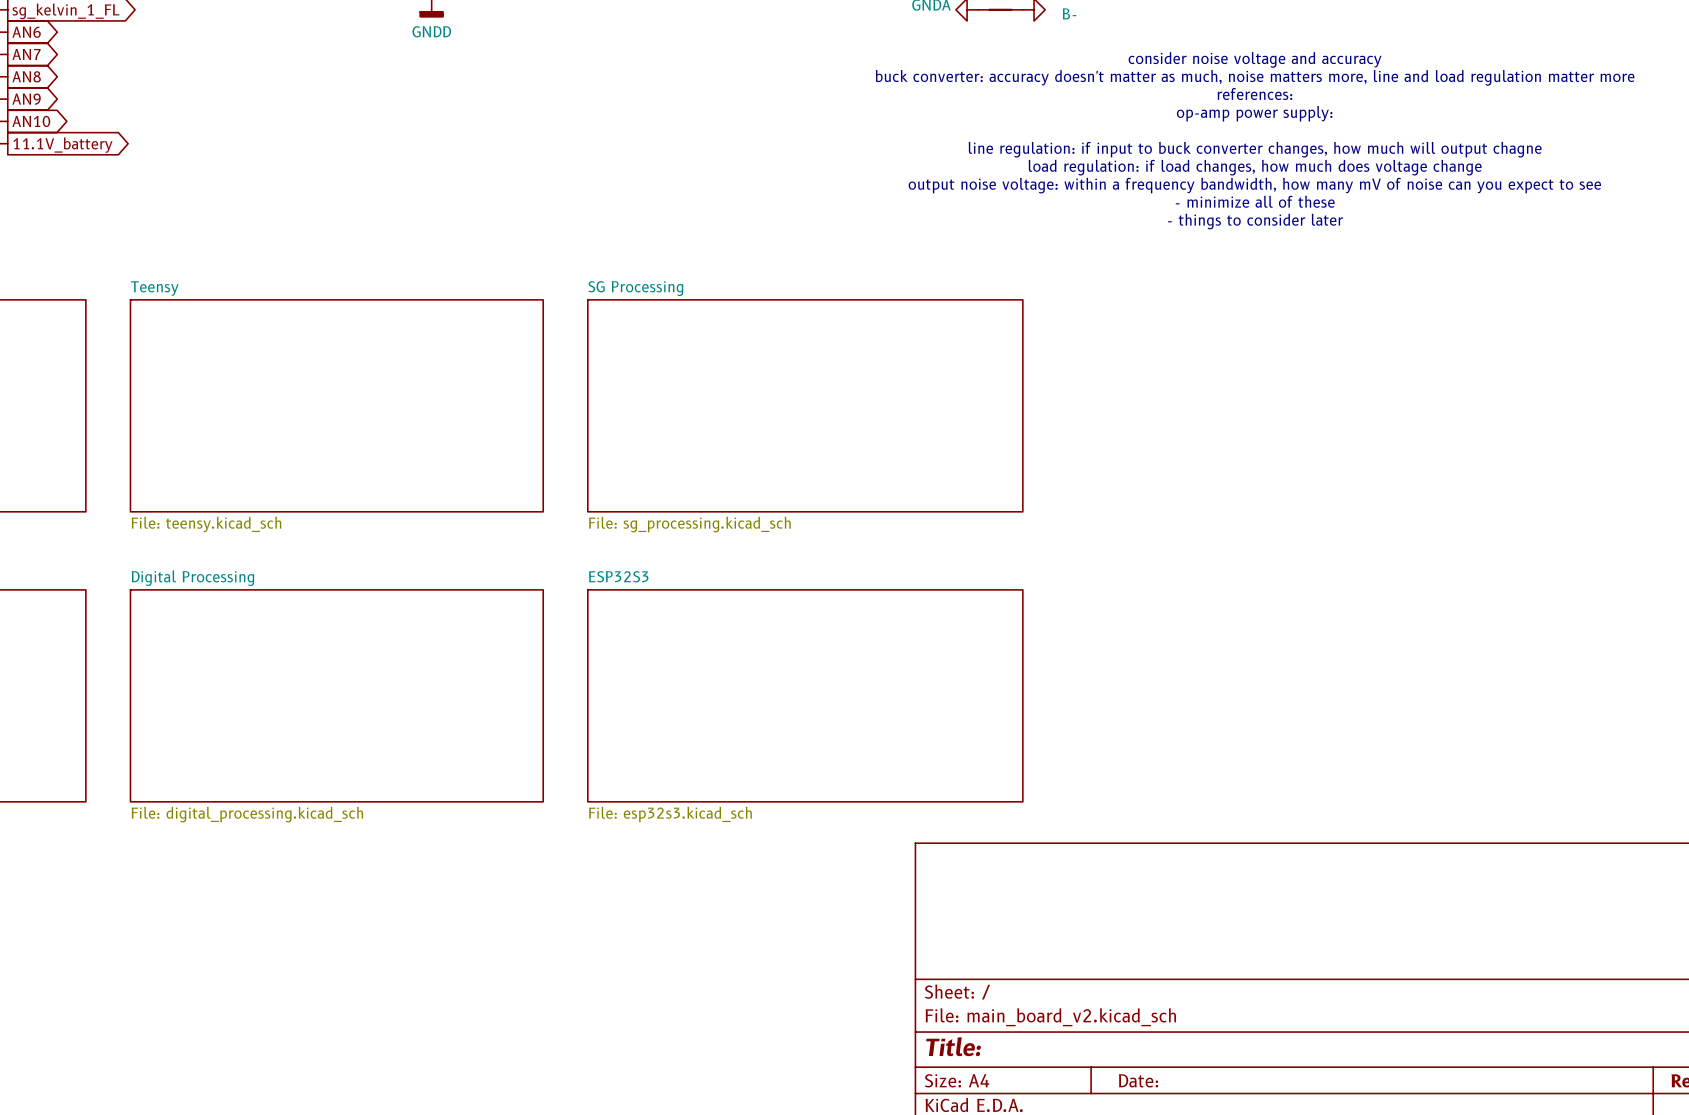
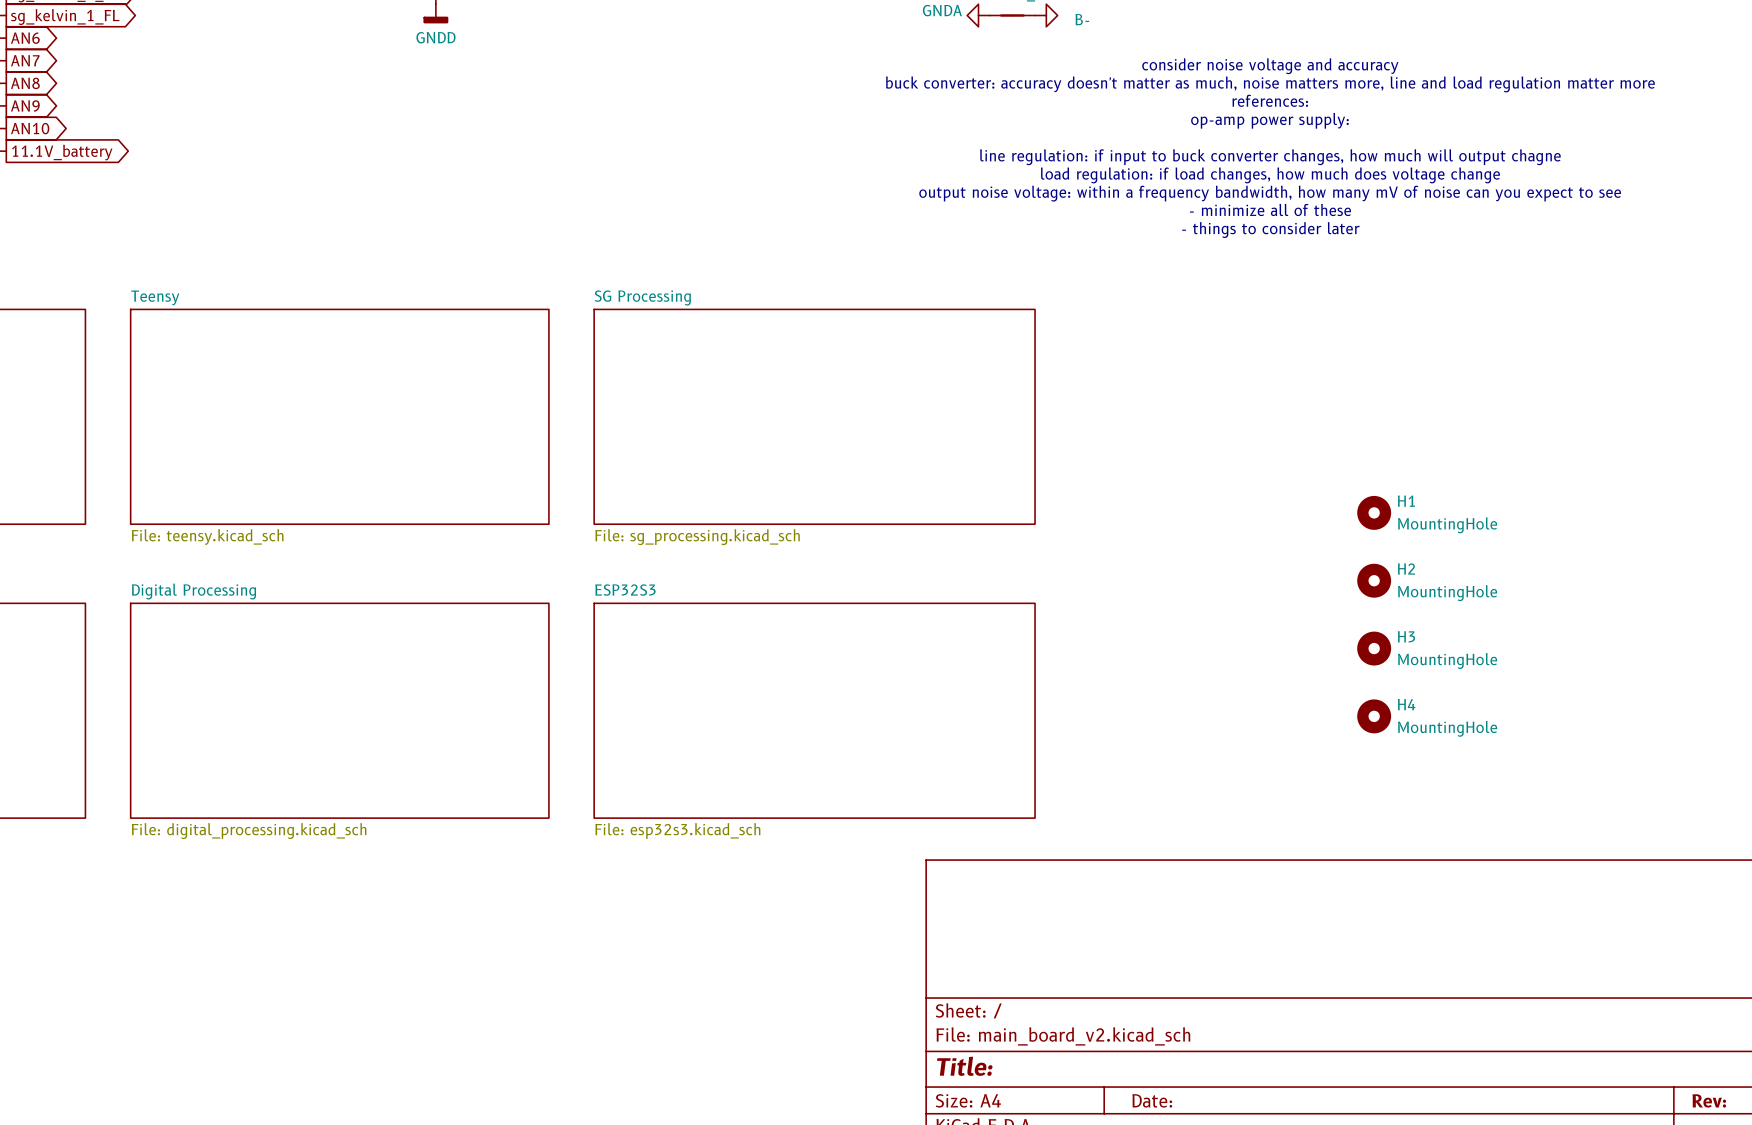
H1: none -> MountingHole (1374, 512)
H2: none -> MountingHole (1374, 580)
H3: none -> MountingHole (1374, 648)
H4: none -> MountingHole (1374, 716)

